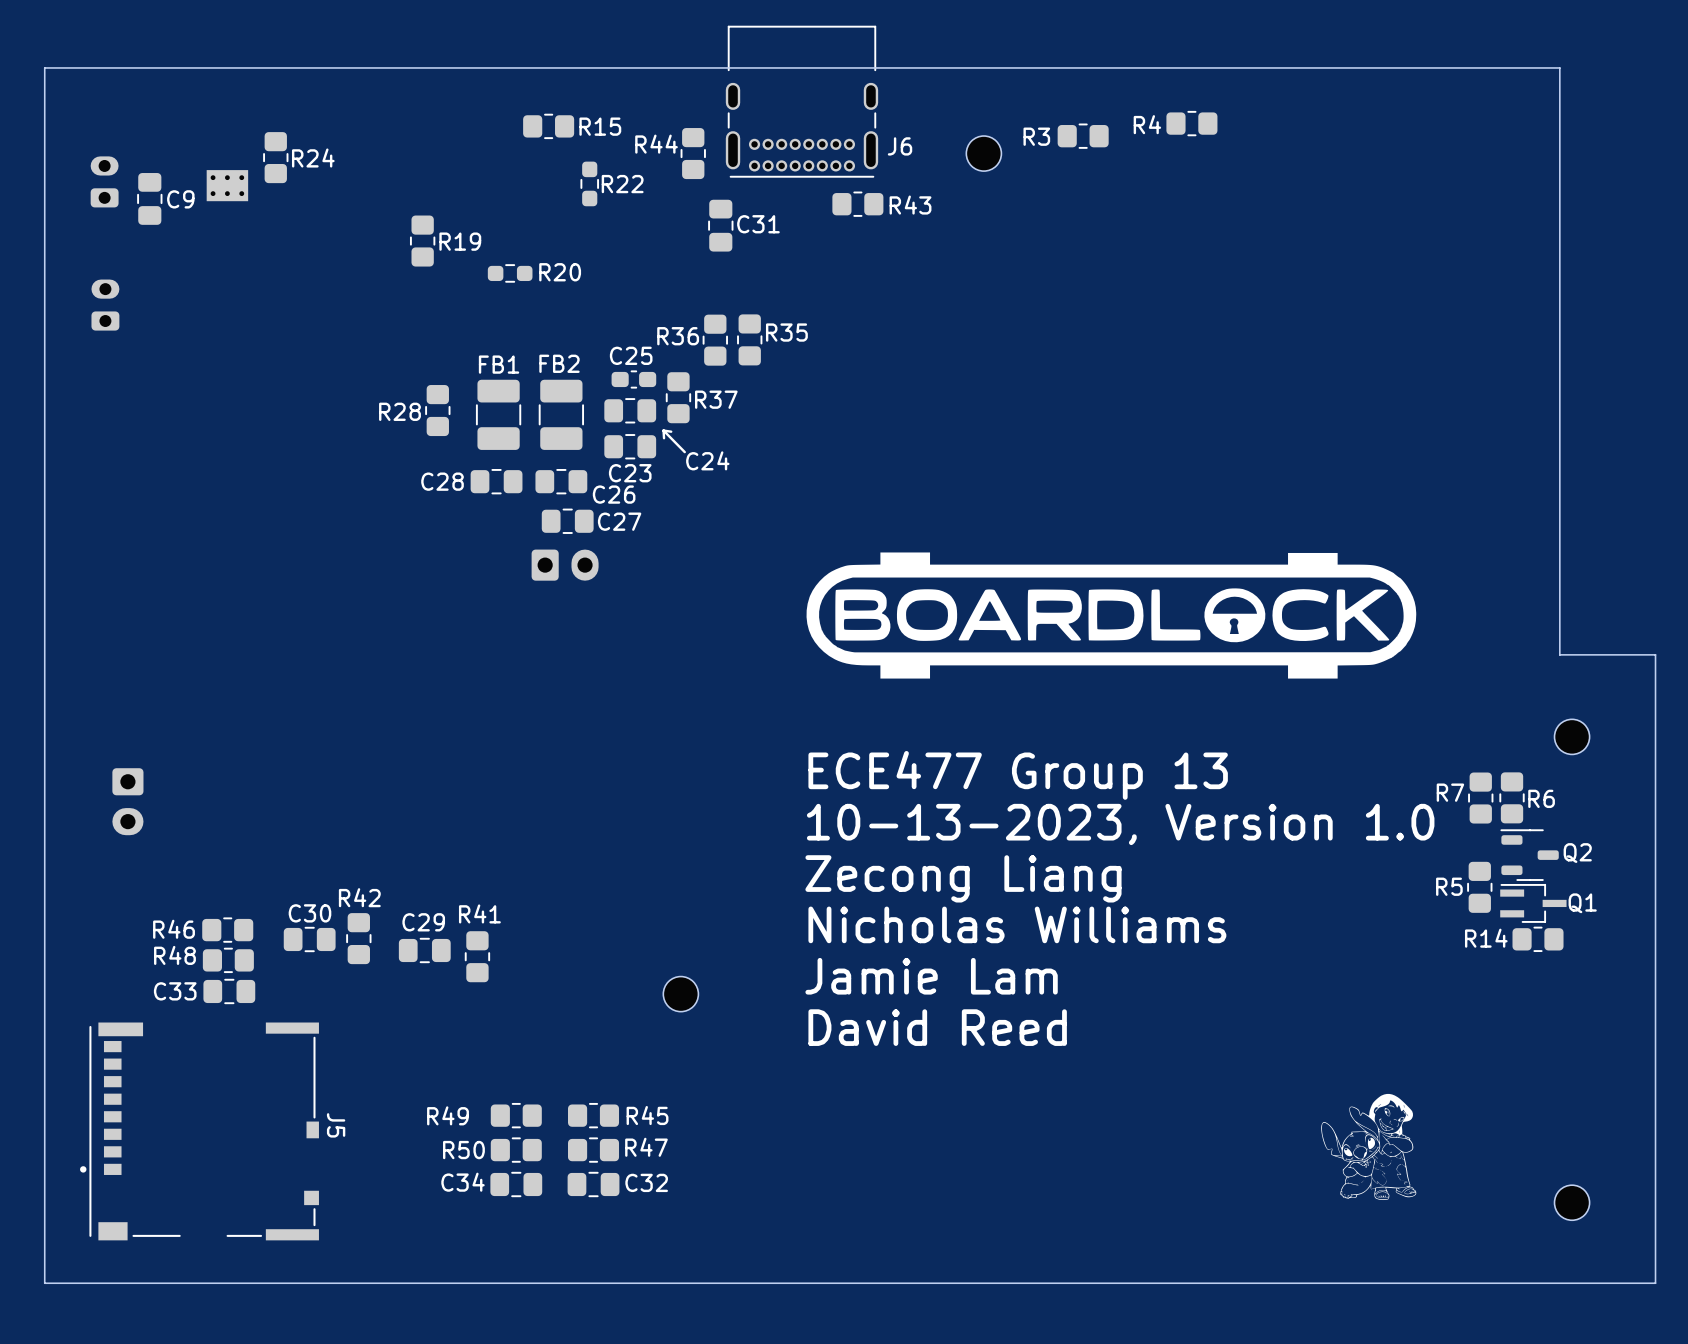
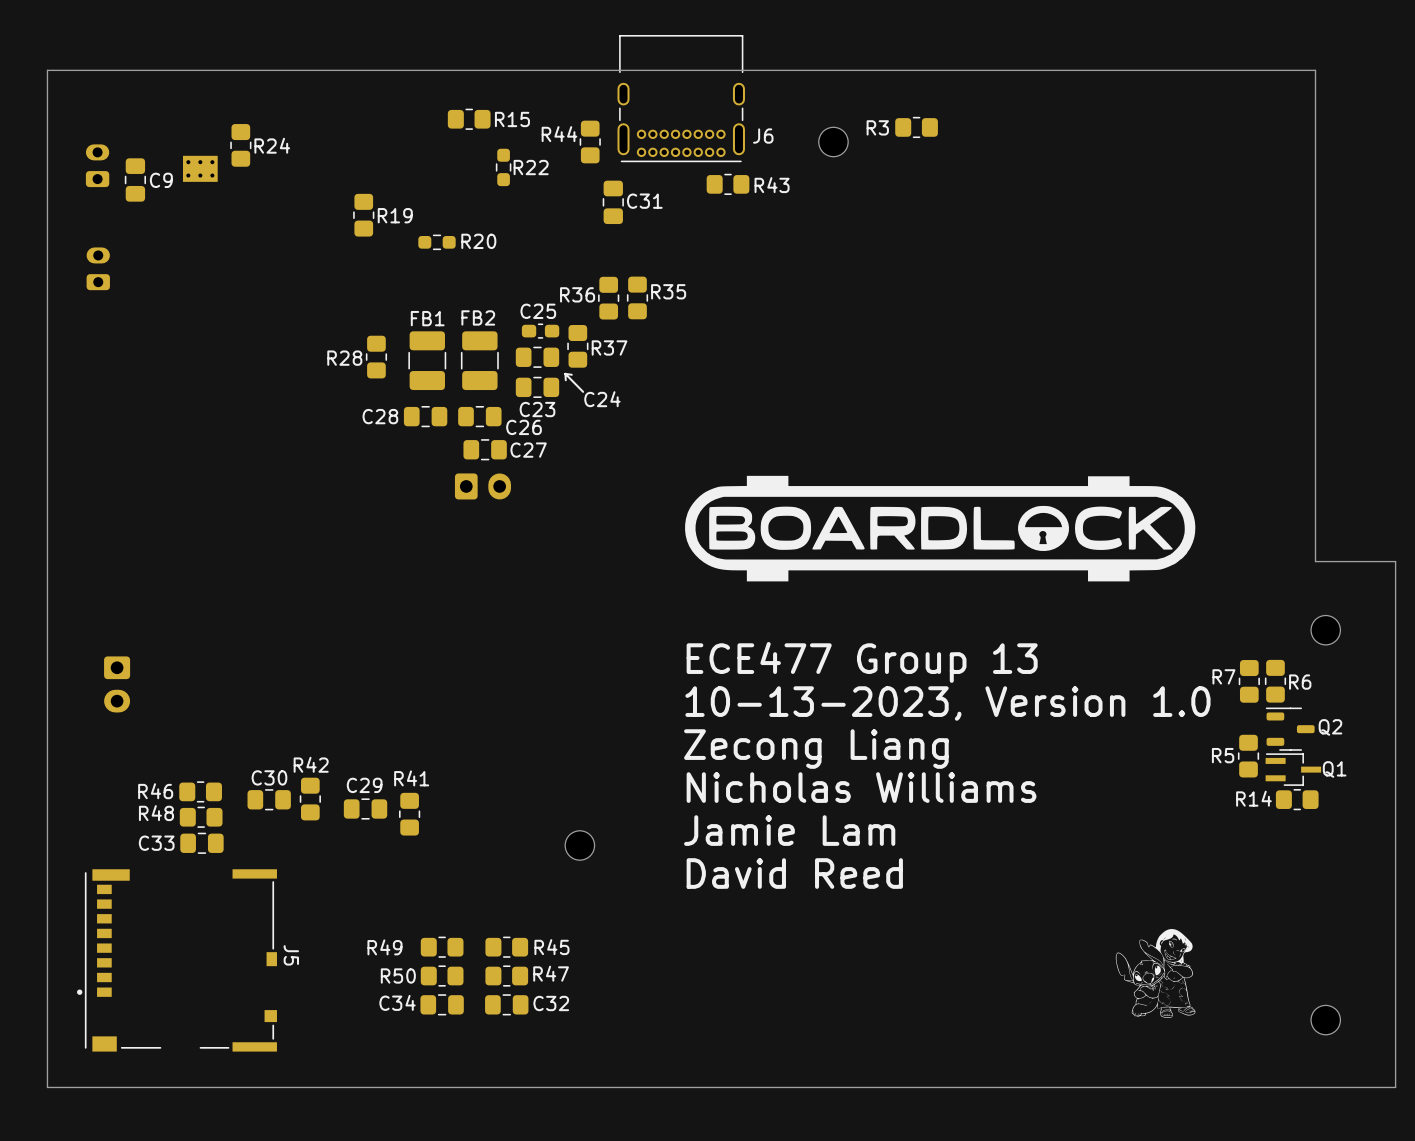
R4: (1191, 123) -> none

